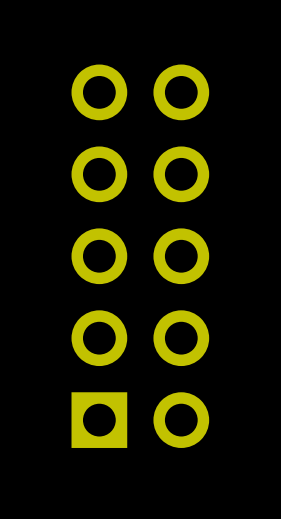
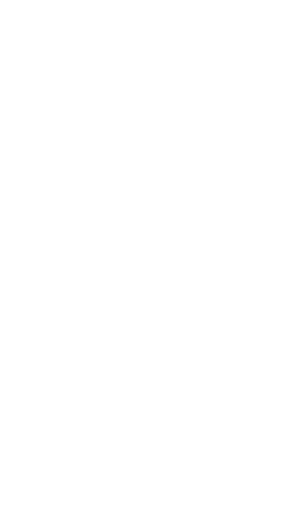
part: (140, 256) -> none

